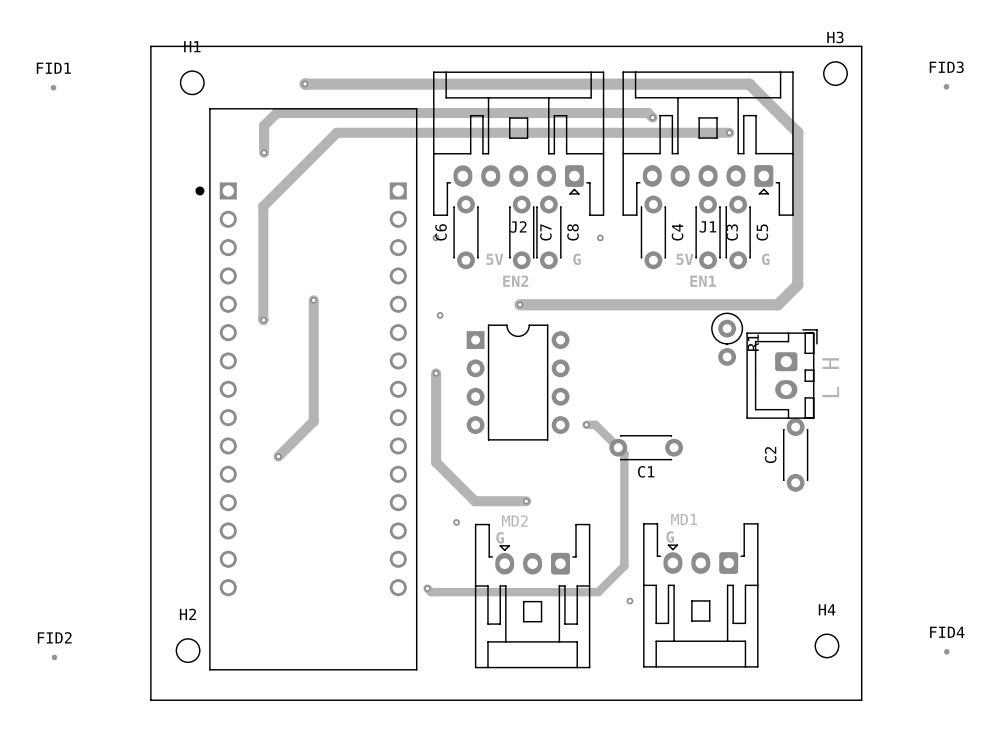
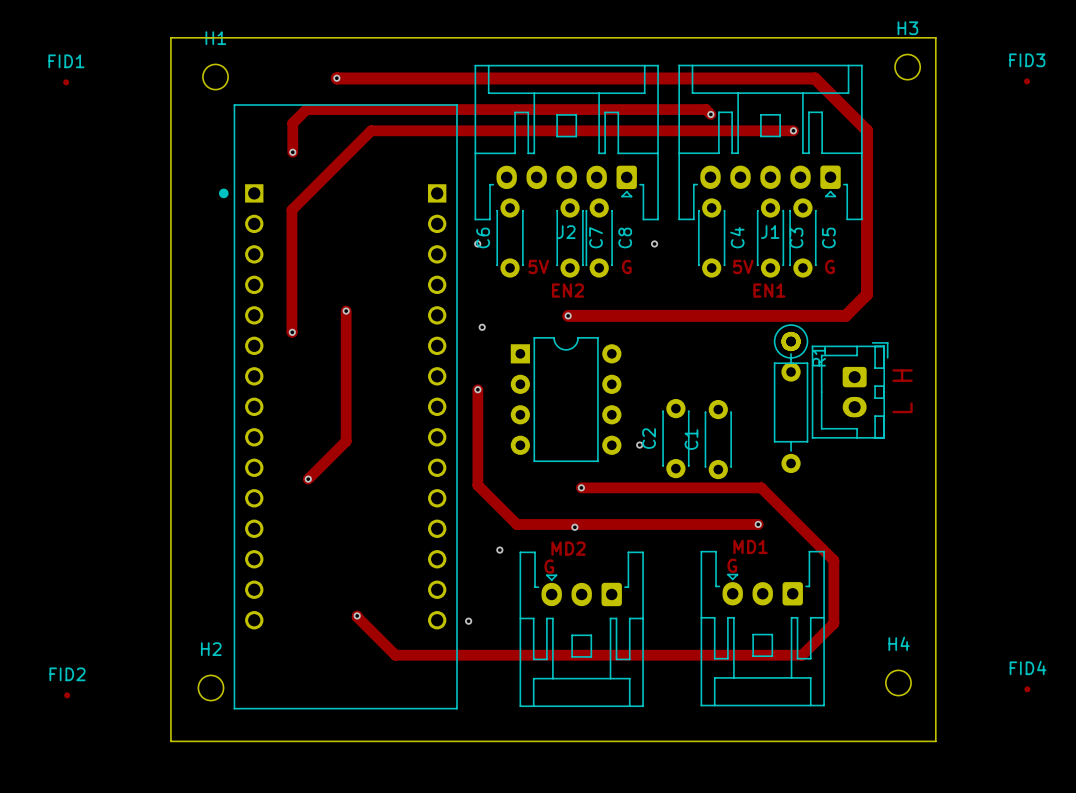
part: none -> (791, 402)
track: (586, 424) (595, 424) (624, 453) (624, 565) (598, 592) (431, 592) (427, 588) -> none
C1 rotation: 0° (646, 447) -> 90° clockwise (718, 439)
C2 position: (795, 454) -> (675, 438)
track: none -> (581, 487) (761, 487) (833, 560) (833, 623) (802, 655) (395, 655) (357, 615)
via: none -> (581, 487)
track: (472, 498) (475, 501) (526, 501) -> (516, 524) (758, 524)
via: none -> (758, 524)
via: none -> (357, 615)
via: (629, 601) -> none

